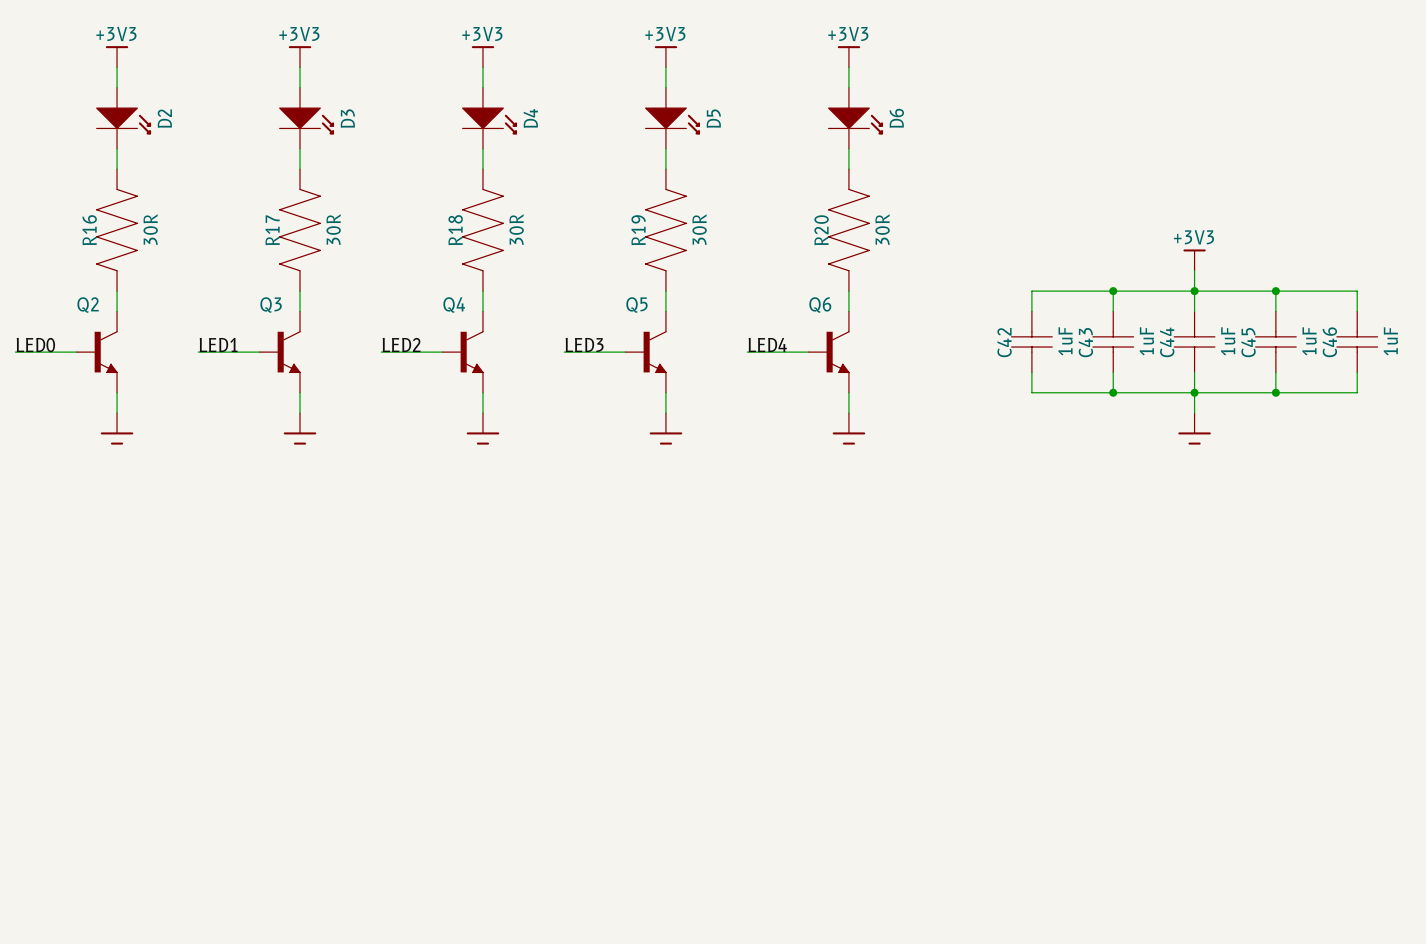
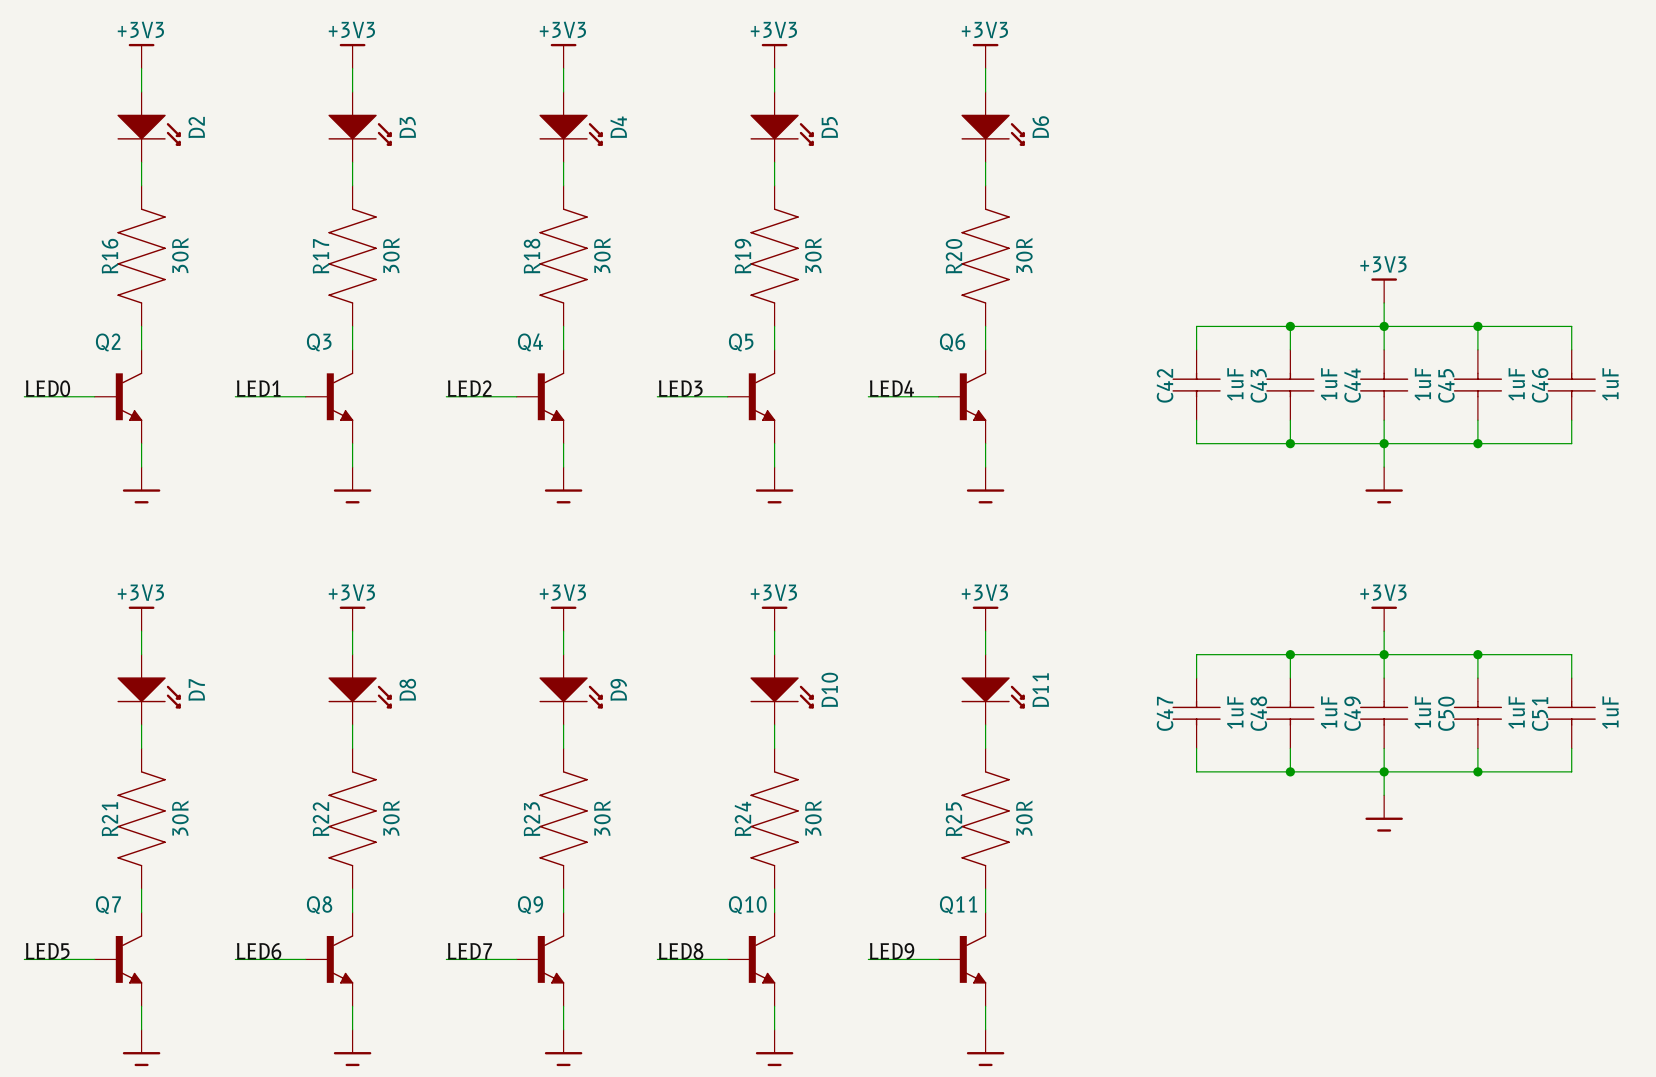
power symbol: none -> +3V3 (141, 618)
power symbol: none -> +3V3 (352, 618)
power symbol: none -> +3V3 (563, 618)
power symbol: none -> +3V3 (774, 618)
power symbol: none -> +3V3 (985, 618)
power symbol: none -> +3V3 (1384, 618)
wire: none -> (141, 631) (141, 654)
wire: none -> (352, 631) (352, 654)
wire: none -> (563, 631) (563, 654)
wire: none -> (774, 631) (774, 654)
wire: none -> (985, 631) (985, 654)
wire: none -> (1384, 631) (1384, 678)
wire: none -> (1290, 654) (1290, 678)
junction: none -> (1290, 654)
junction: none -> (1384, 654)
wire: none -> (1477, 654) (1477, 678)
junction: none -> (1477, 654)
wire: none -> (1196, 678) (1196, 654) (1571, 654) (1571, 678)
D7: none -> (149, 689)
D8: none -> (360, 689)
D9: none -> (571, 689)
D10: none -> (782, 689)
D11: none -> (993, 689)
C47: none -> 1uF (1196, 713)
C48: none -> 1uF (1290, 713)
C49: none -> 1uF (1384, 713)
C50: none -> 1uF (1477, 713)
C51: none -> 1uF (1571, 713)
wire: none -> (141, 724) (141, 748)
wire: none -> (352, 724) (352, 748)
wire: none -> (563, 724) (563, 748)
wire: none -> (774, 724) (774, 748)
wire: none -> (985, 724) (985, 748)
wire: none -> (1196, 748) (1196, 771) (1571, 771) (1571, 748)
wire: none -> (1290, 748) (1290, 771)
wire: none -> (1384, 748) (1384, 795)
wire: none -> (1477, 748) (1477, 771)
junction: none -> (1290, 771)
junction: none -> (1384, 771)
junction: none -> (1477, 771)
power symbol: none -> (1384, 813)
R21: none -> 30R (141, 818)
R22: none -> 30R (352, 818)
R23: none -> 30R (563, 818)
R24: none -> 30R (774, 818)
R25: none -> 30R (985, 818)
wire: none -> (141, 889) (141, 912)
wire: none -> (352, 889) (352, 912)
wire: none -> (563, 889) (563, 912)
wire: none -> (774, 889) (774, 912)
wire: none -> (985, 889) (985, 912)
label: none -> LED5 (47, 951)
label: none -> LED7 (469, 951)
label: none -> LED6 (259, 951)
label: none -> LED8 (681, 951)
label: none -> LED9 (892, 951)
wire: none -> (24, 959) (94, 959)
Q7: none -> (118, 959)
wire: none -> (235, 959) (305, 959)
Q8: none -> (329, 959)
wire: none -> (446, 959) (516, 959)
Q9: none -> (540, 959)
wire: none -> (657, 959) (727, 959)
Q10: none -> (751, 959)
wire: none -> (868, 959) (938, 959)
Q11: none -> (962, 959)
wire: none -> (141, 1006) (141, 1029)
wire: none -> (352, 1006) (352, 1029)
wire: none -> (563, 1006) (563, 1029)
wire: none -> (774, 1006) (774, 1029)
wire: none -> (985, 1006) (985, 1029)
power symbol: none -> (141, 1047)
power symbol: none -> (352, 1047)
power symbol: none -> (563, 1047)
power symbol: none -> (774, 1047)
power symbol: none -> (985, 1047)

